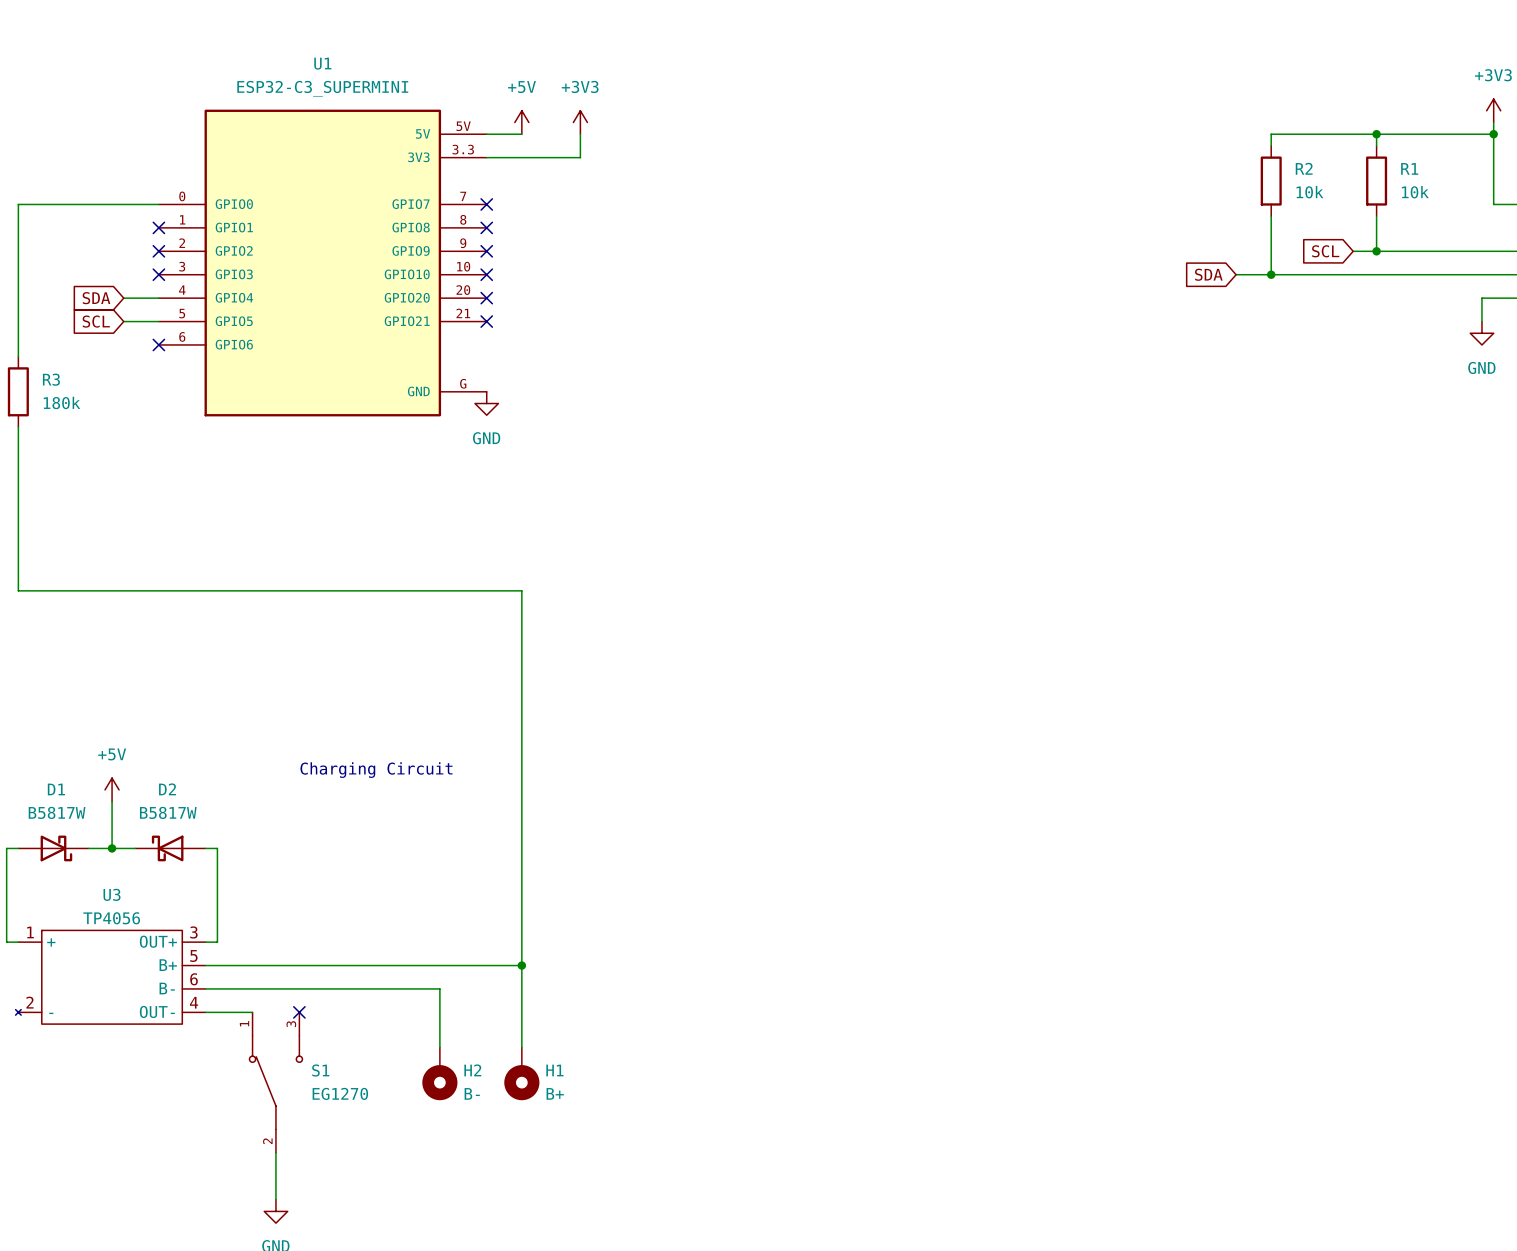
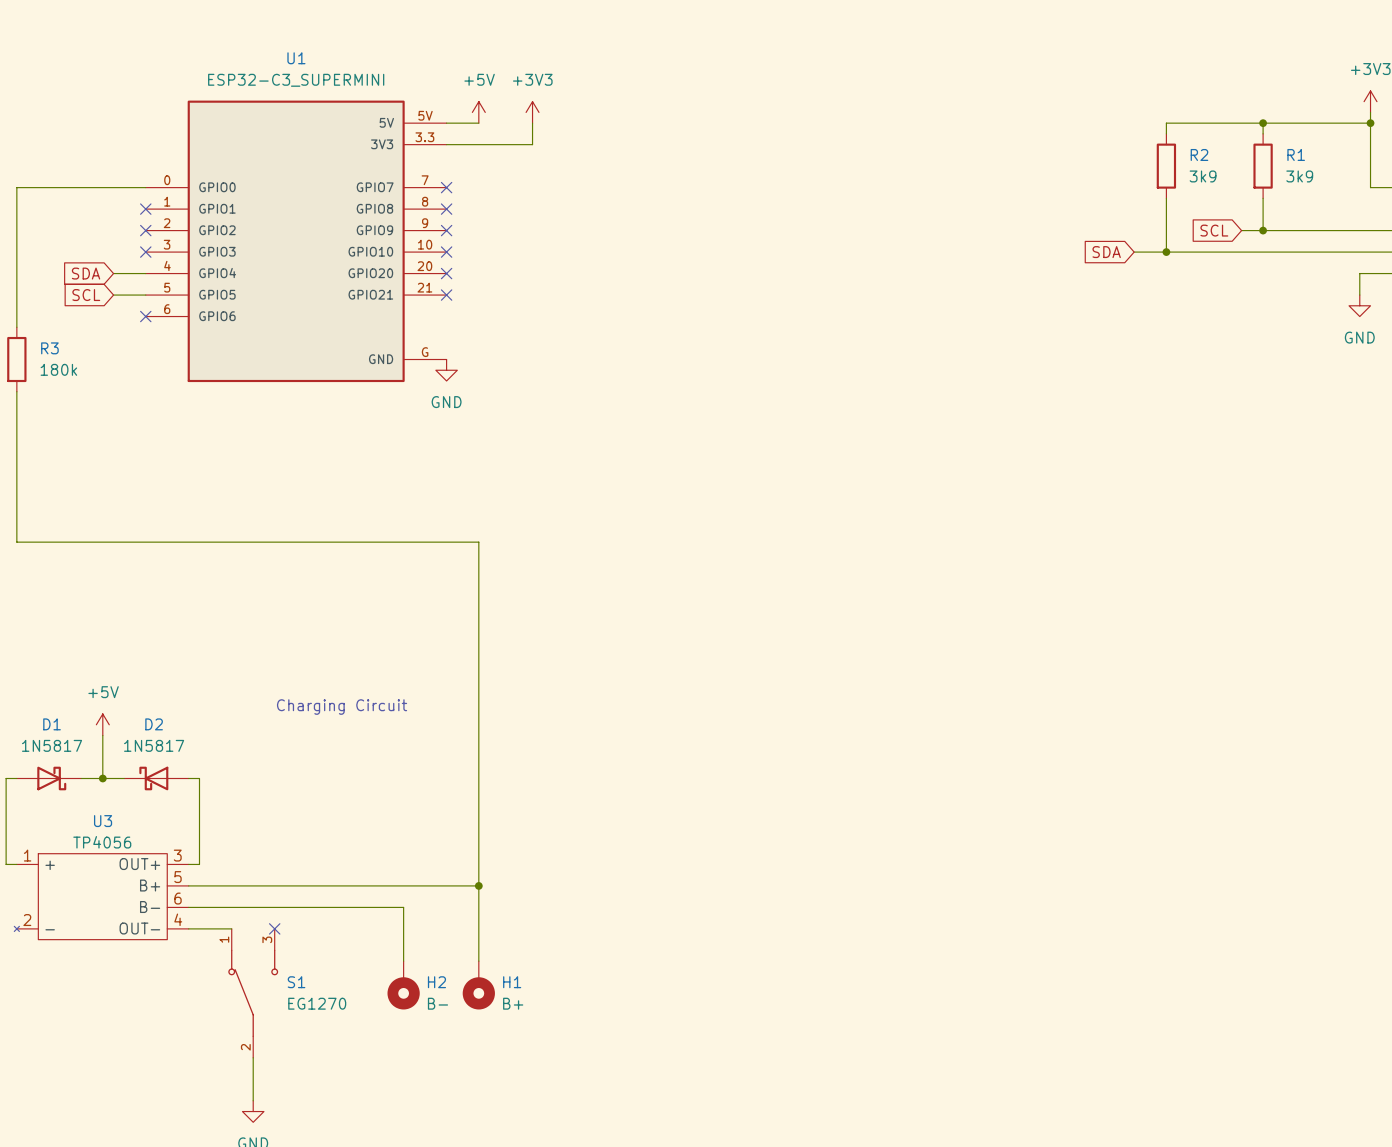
R2 value: 10k (1309, 192) -> 3k9 (1203, 176)
R1 value: 10k (1415, 192) -> 3k9 (1299, 176)
D1 value: B5817W (57, 812) -> 1N5817 (52, 745)
D2 value: B5817W (168, 812) -> 1N5817 (154, 745)

